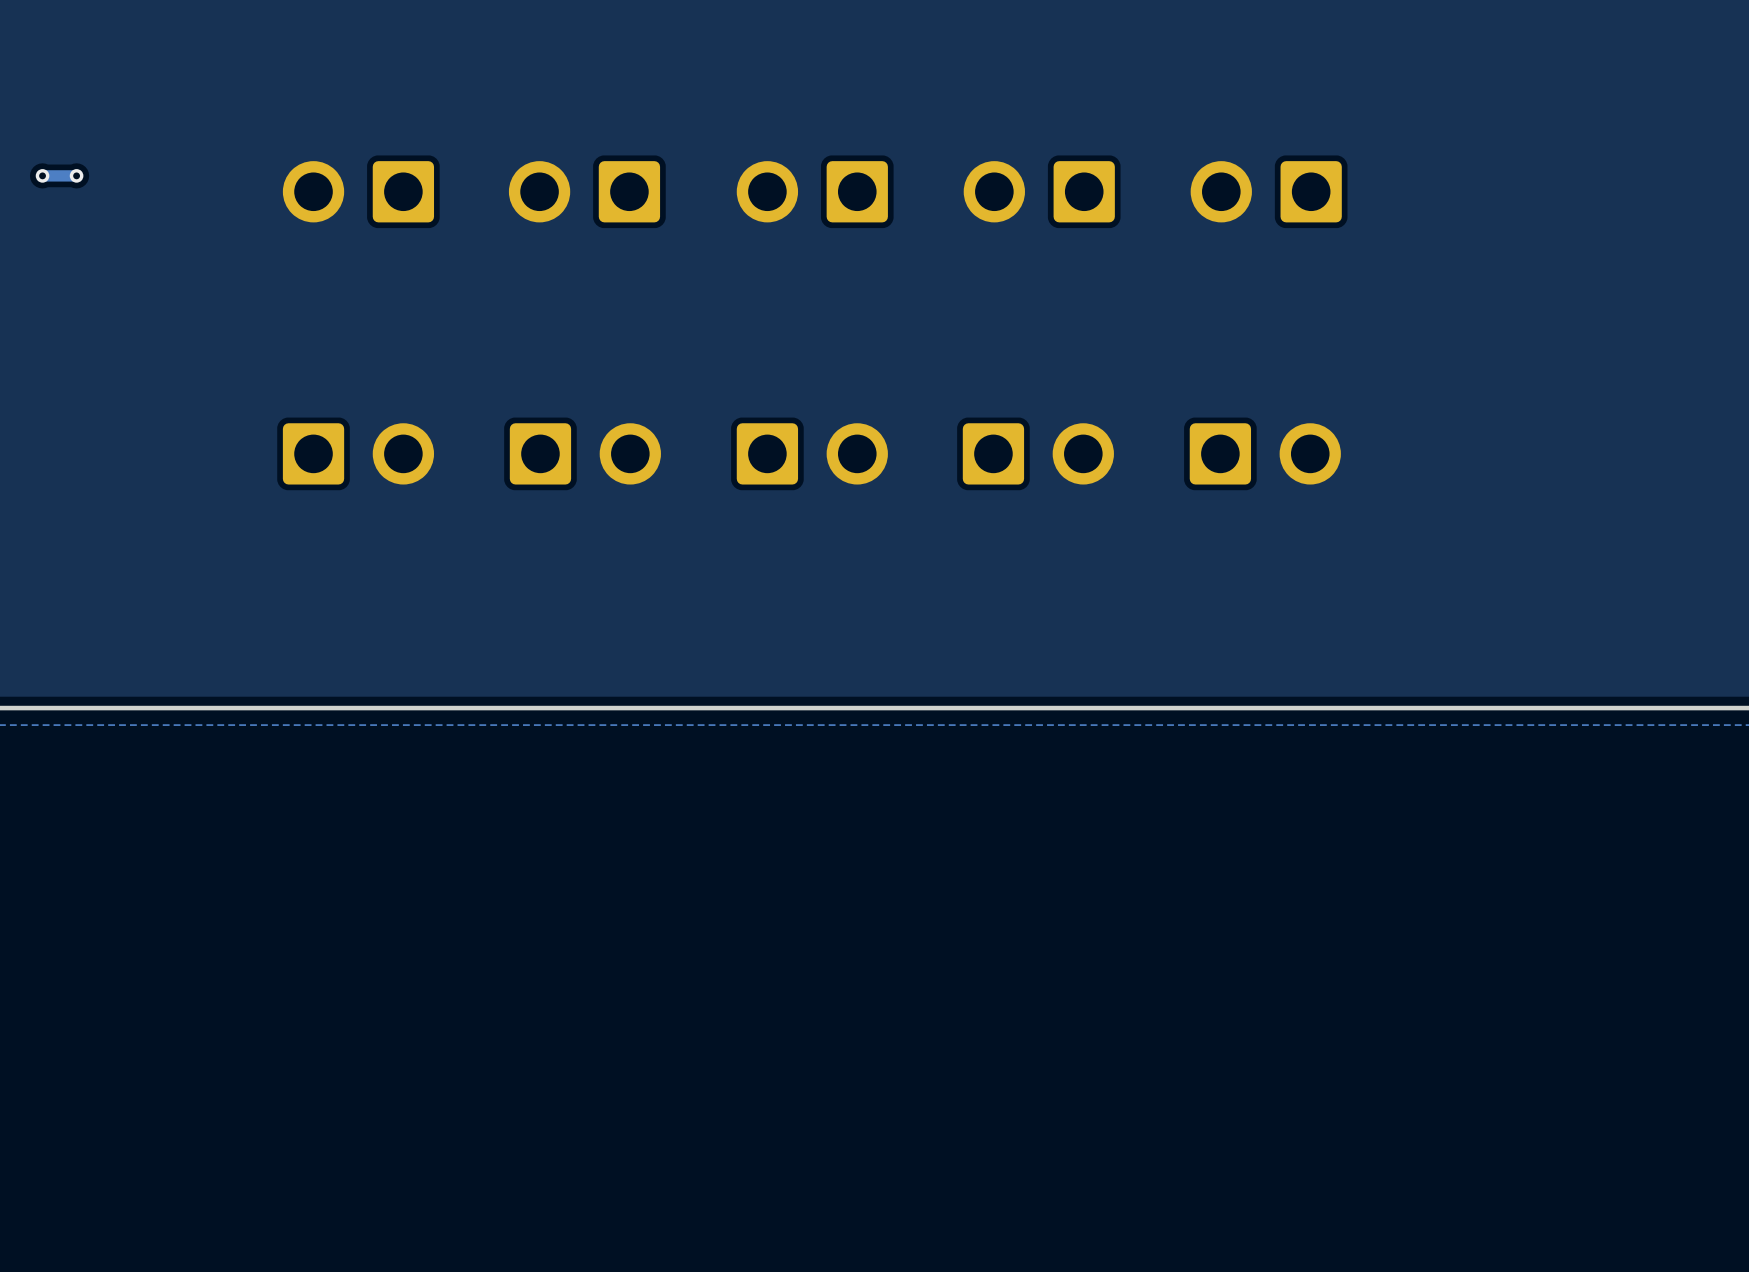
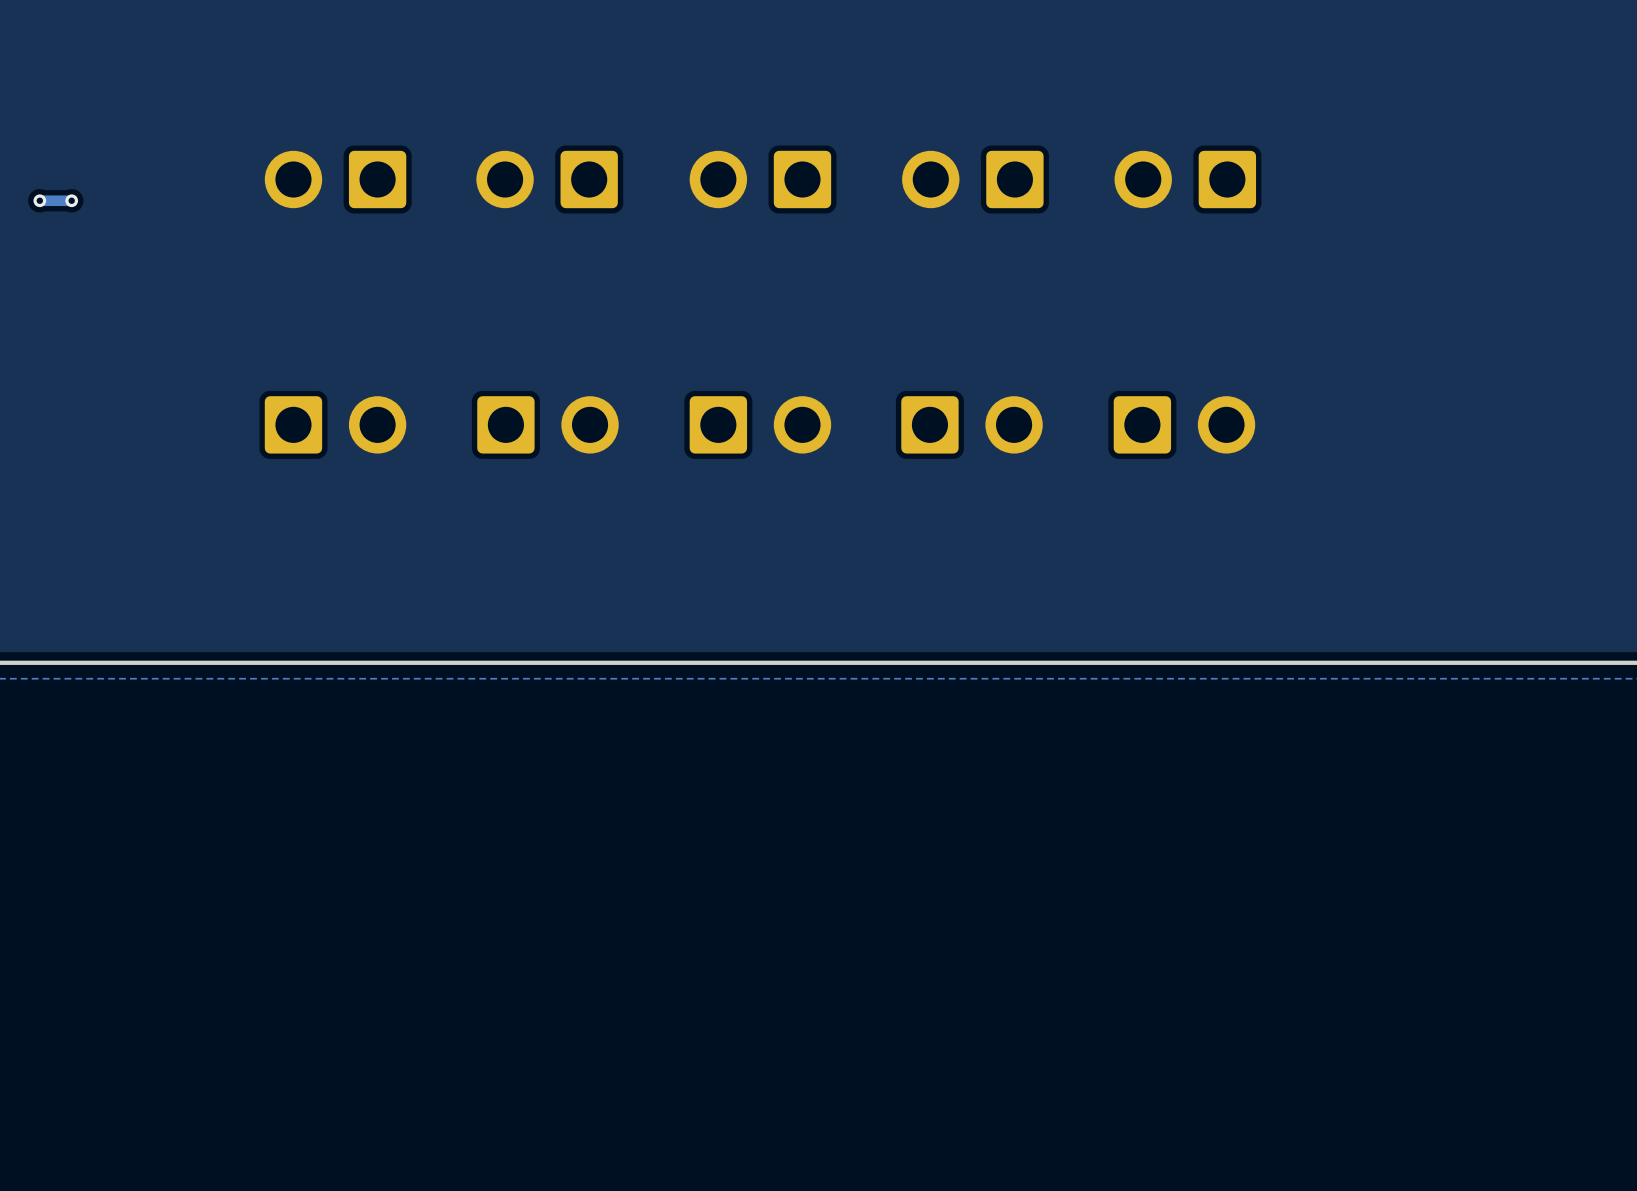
via: (42, 175) -> none
track: (76, 175) (42, 175) -> (71, 200) (39, 200)
via: (76, 175) -> none
via: none -> (39, 200)
via: none -> (71, 200)

